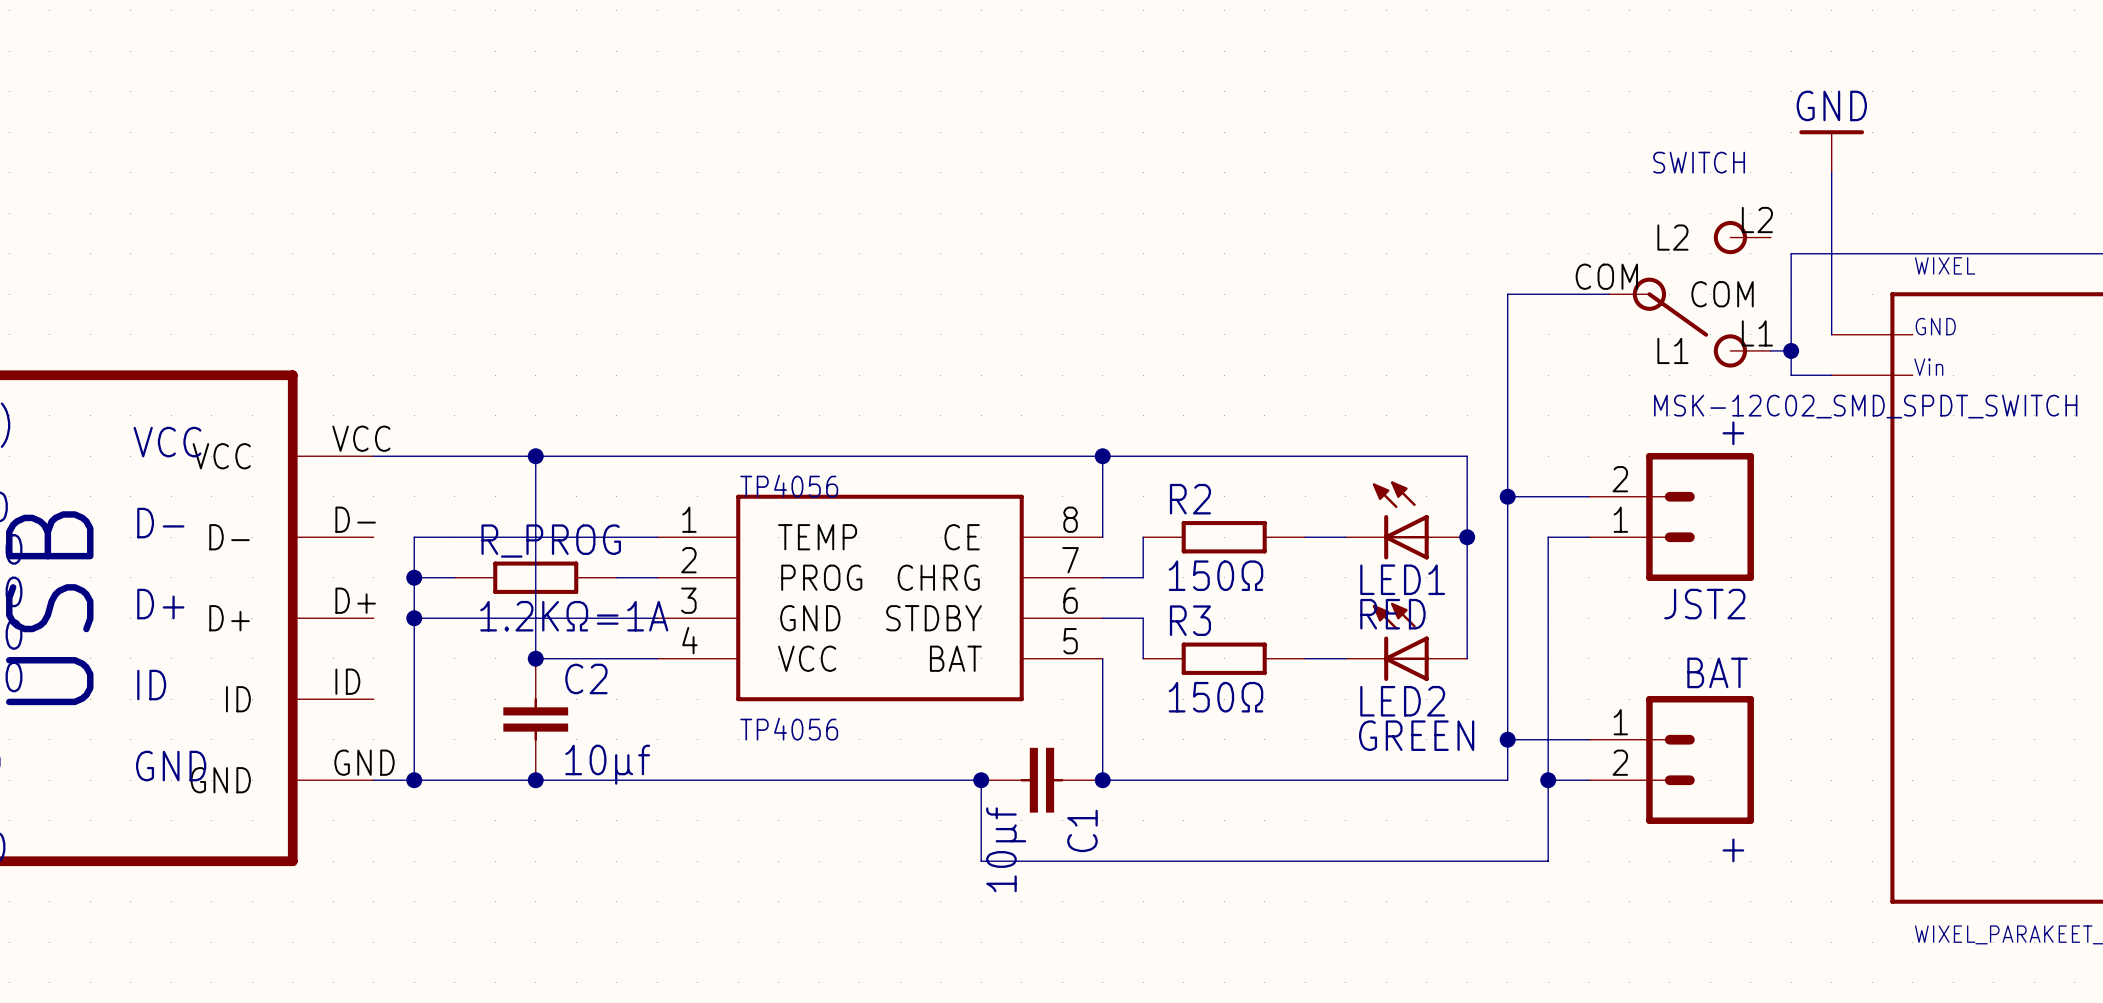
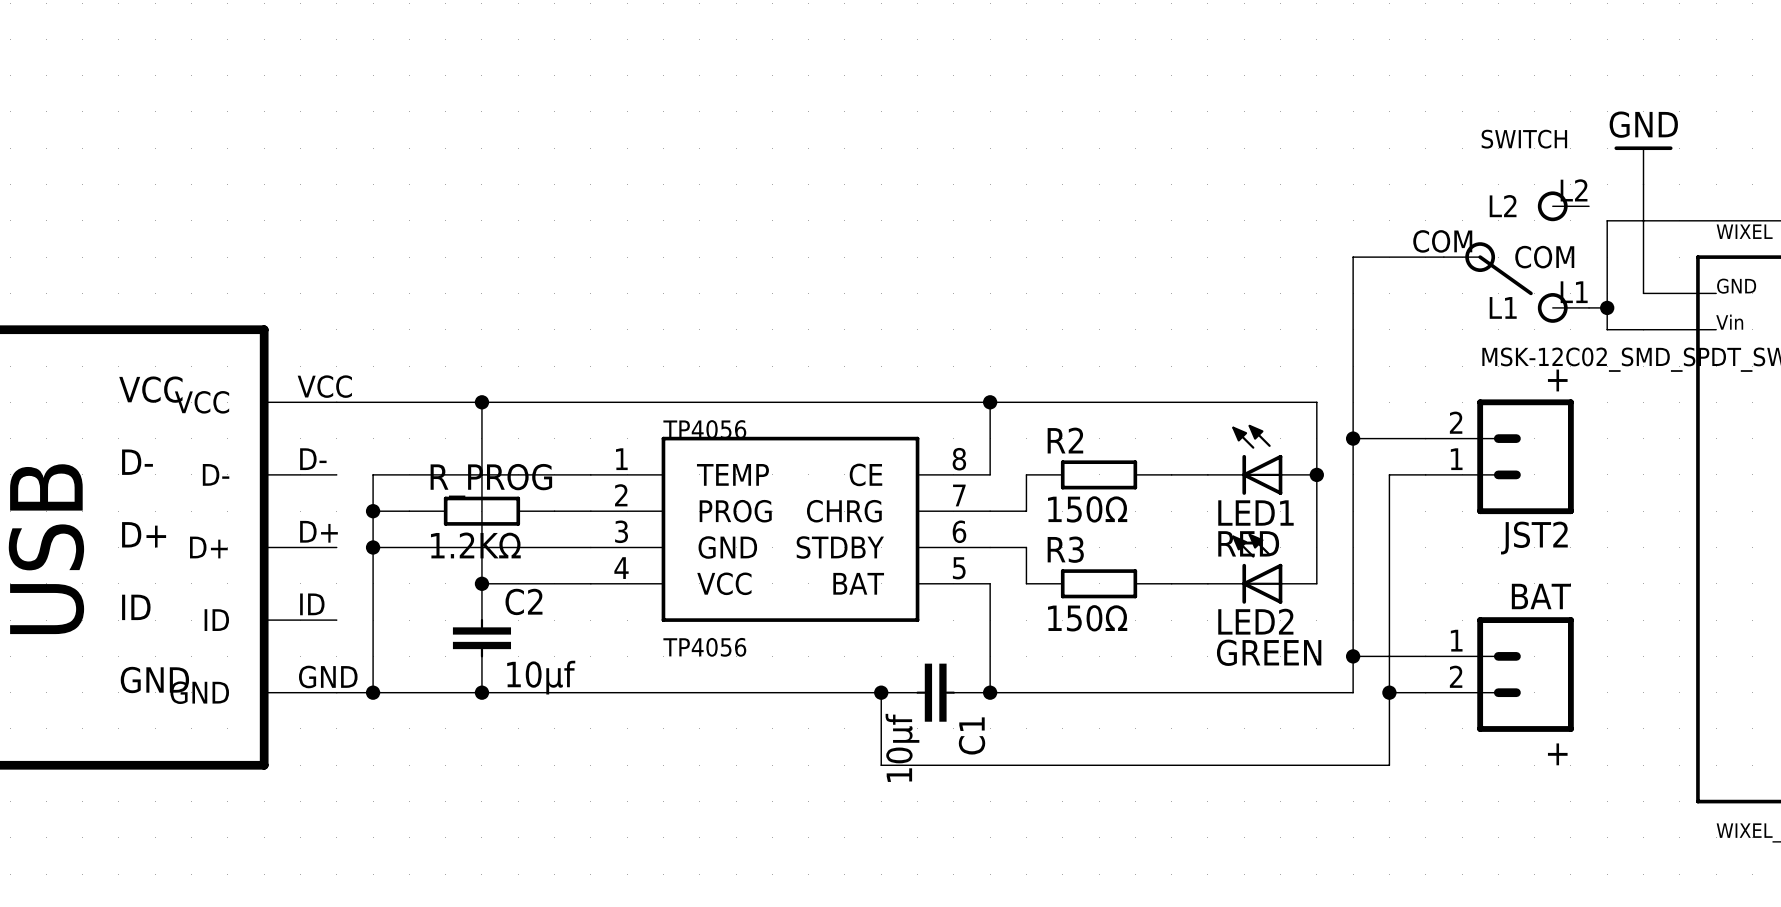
power symbol position: GND (1831, 151) -> GND (1643, 165)
R_PROG value: 1.2KΩ=1A (574, 616) -> 1.2KΩ (475, 545)

